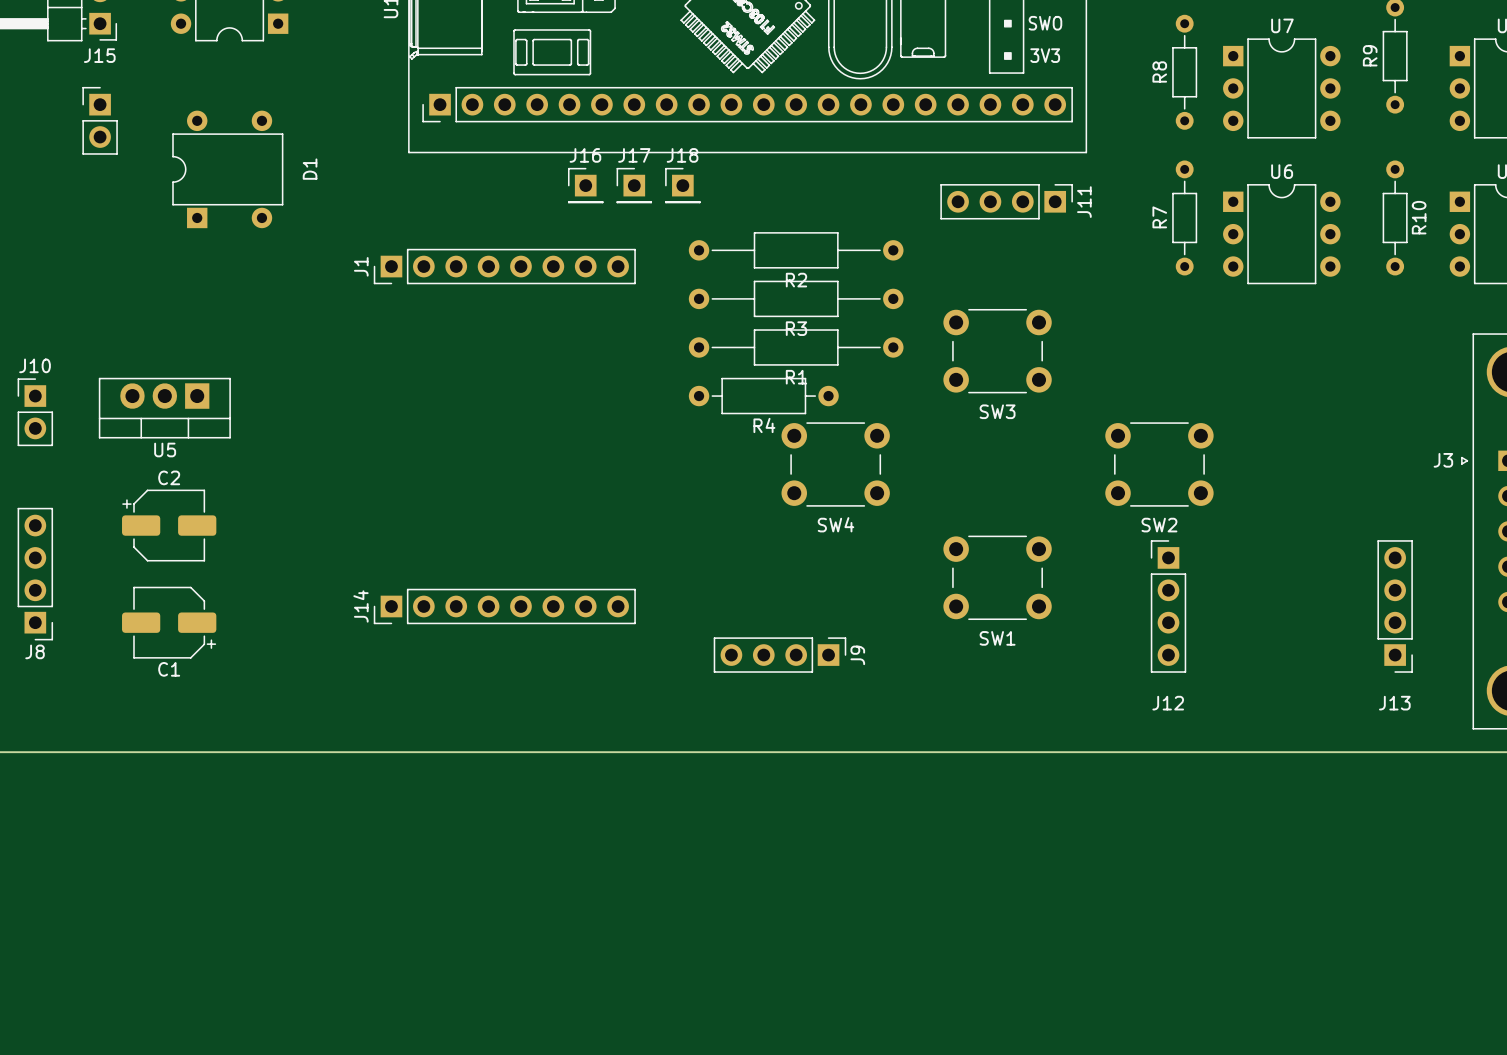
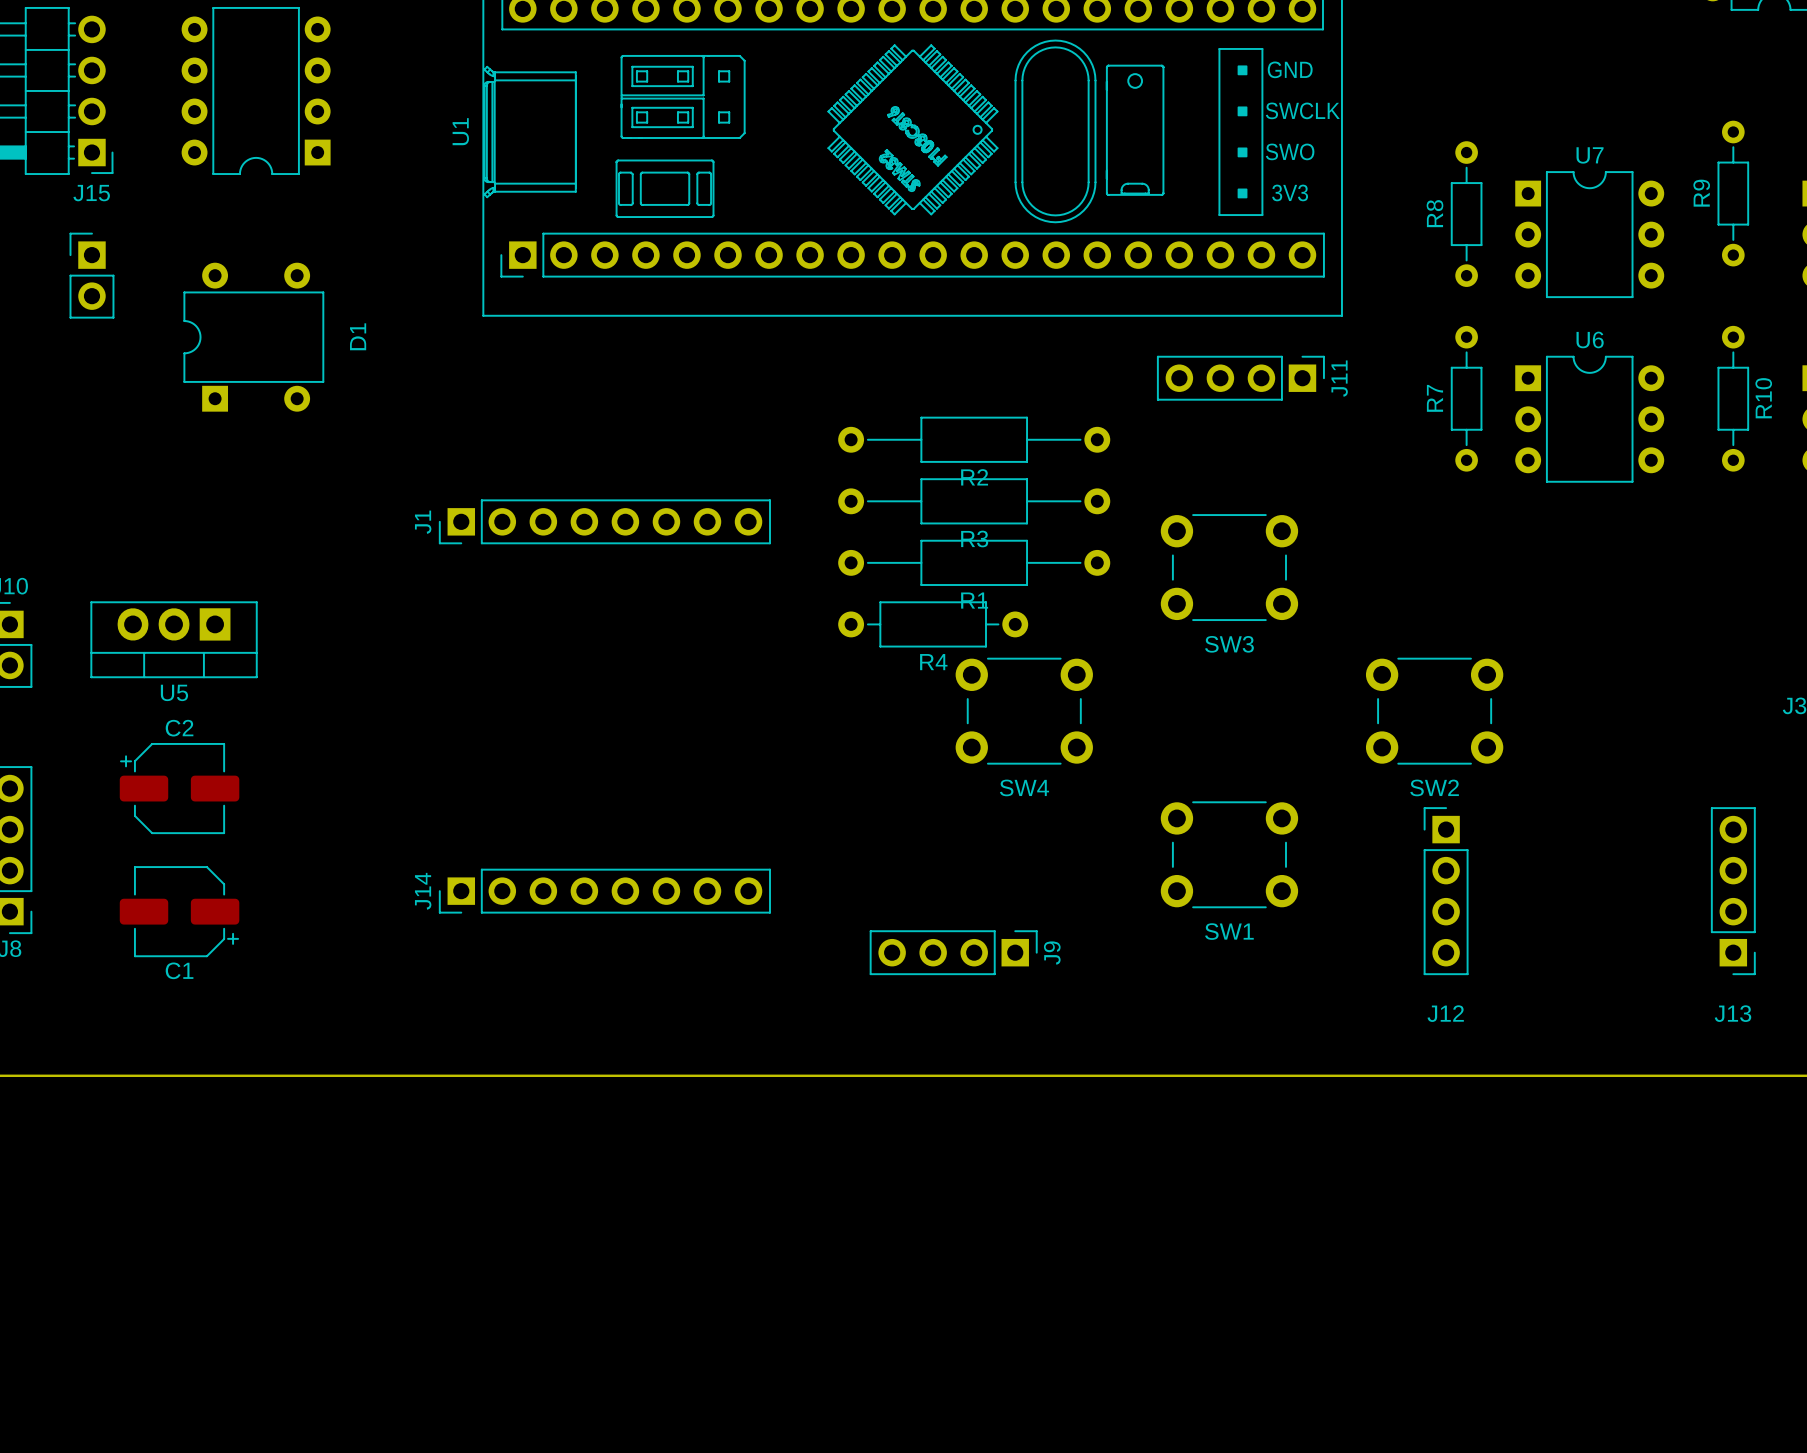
J16: (585, 185) -> none
J17: (634, 185) -> none
J18: (682, 185) -> none
J1 position: (504, 266) -> (604, 521)

